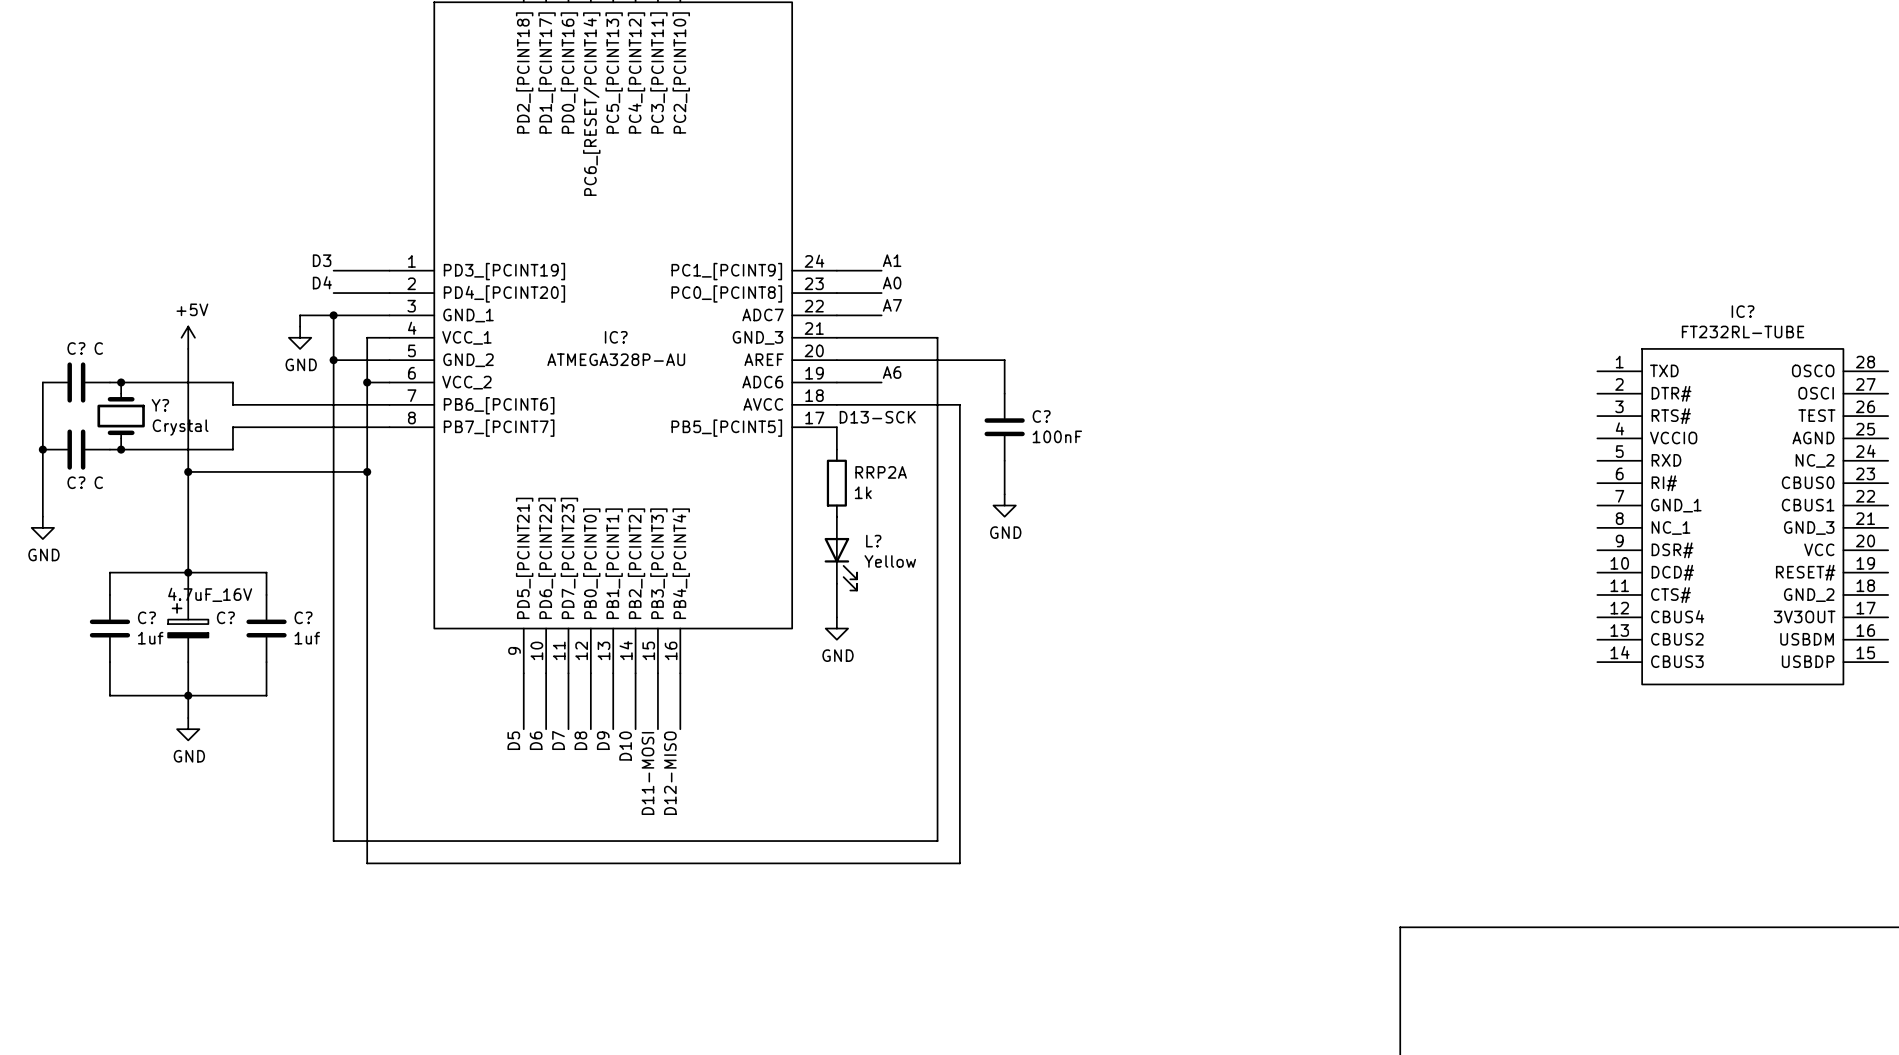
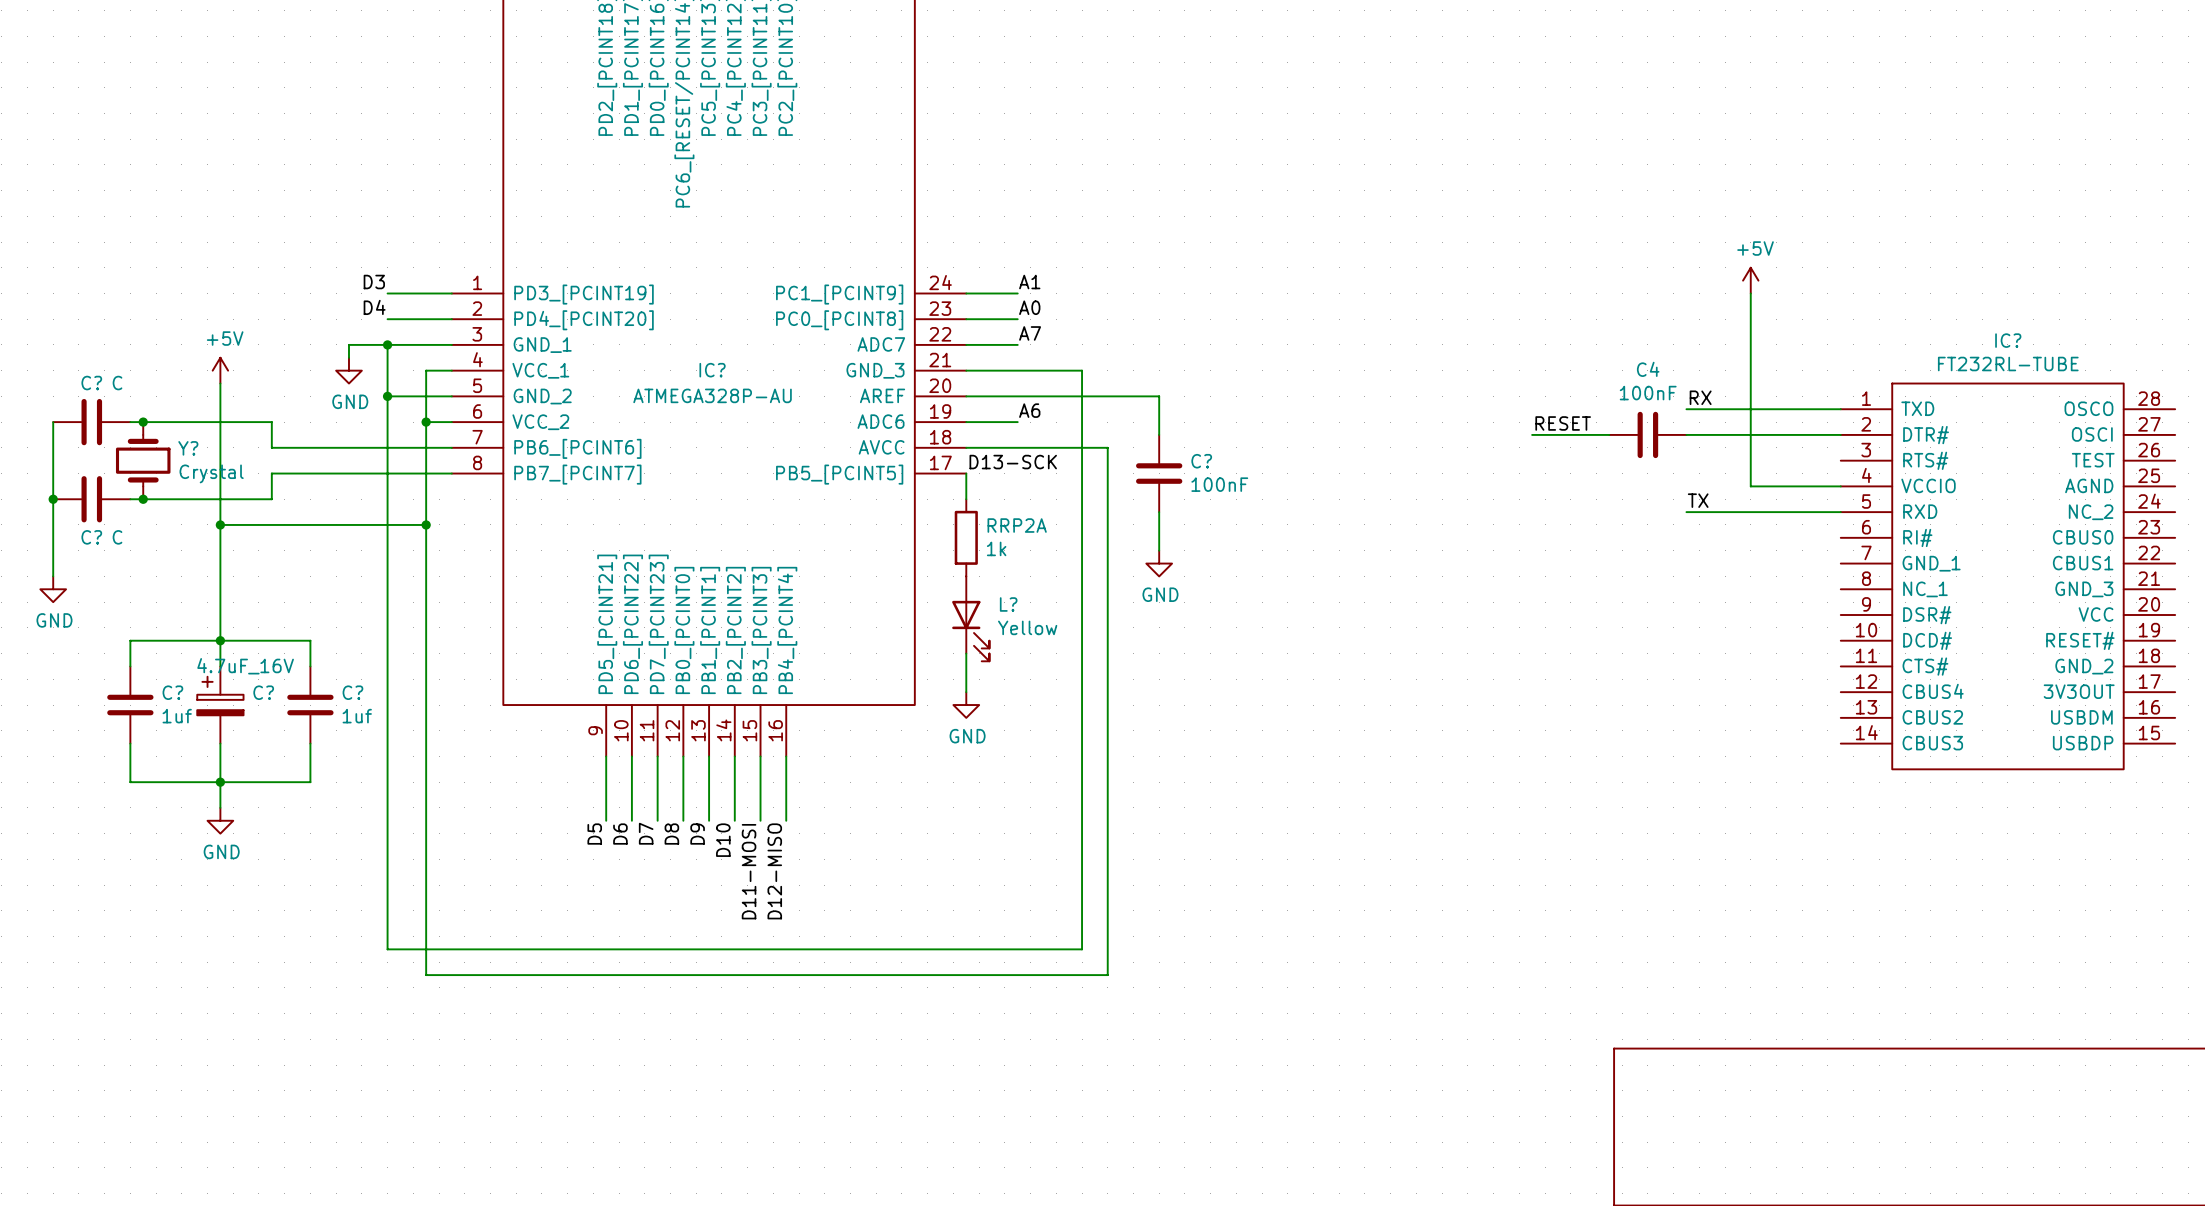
power symbol: none -> +5V (1750, 280)
wire: none -> (1750, 293) (1750, 486) (1840, 486)
label: none -> RX (1700, 397)
wire: none -> (1686, 409) (1840, 409)
label: none -> RESET (1563, 423)
wire: none -> (1532, 434) (1609, 434)
C4: none -> 100nF (1647, 434)
wire: none -> (1686, 434) (1840, 434)
label: none -> TX (1698, 500)
wire: none -> (1686, 512) (1840, 512)

